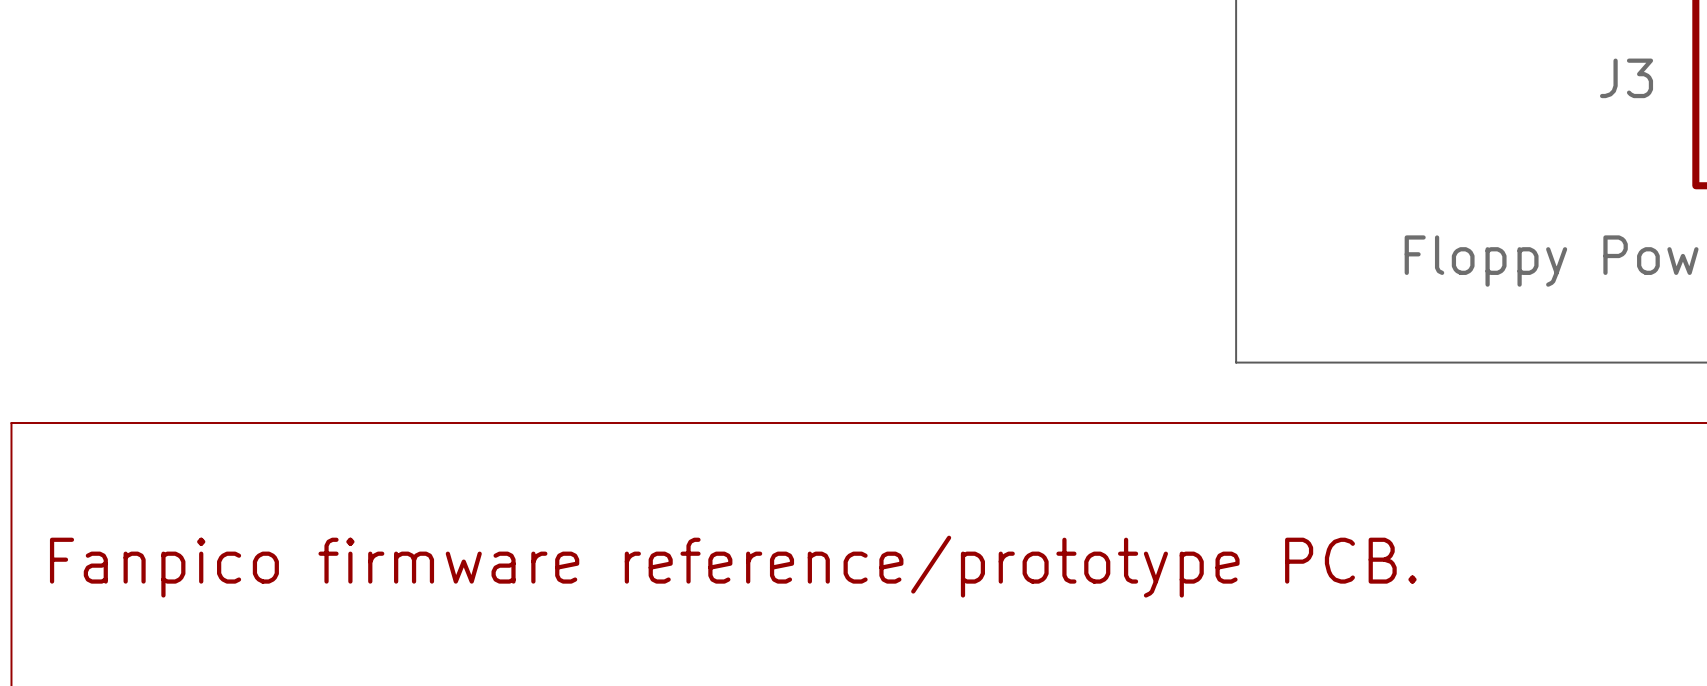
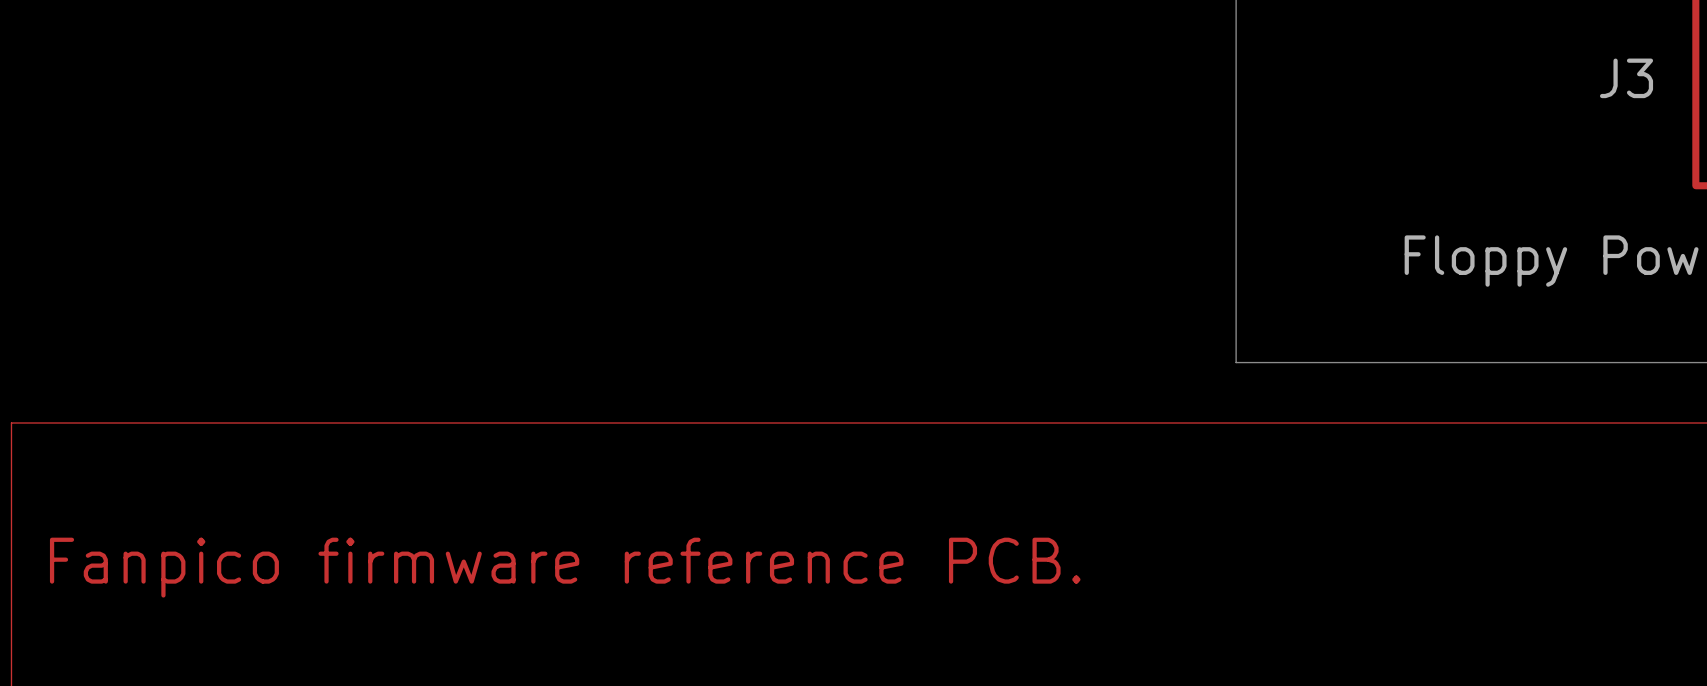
title block: Fanpico firmware reference/prototype PCB. (733, 566) -> Fanpico firmware reference PCB. (565, 567)

